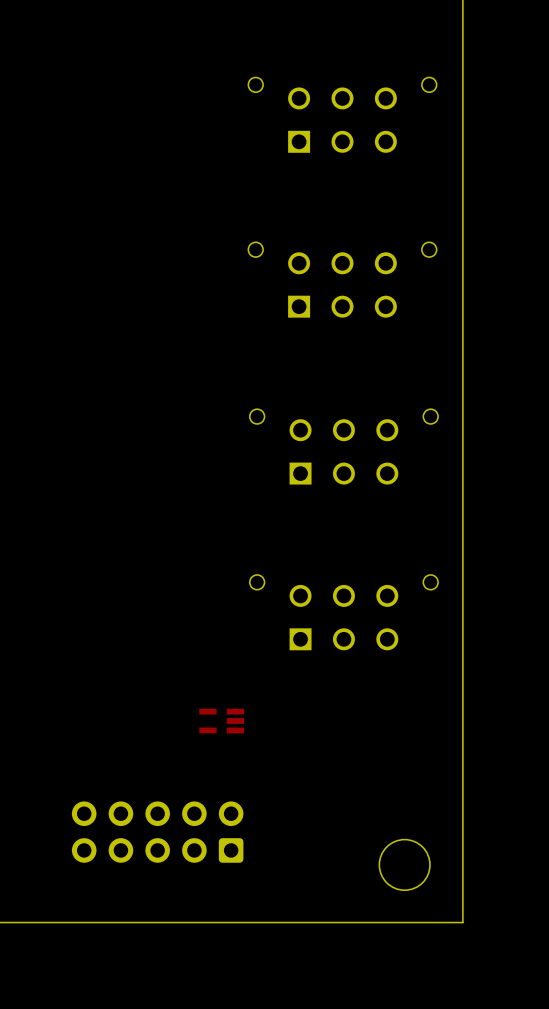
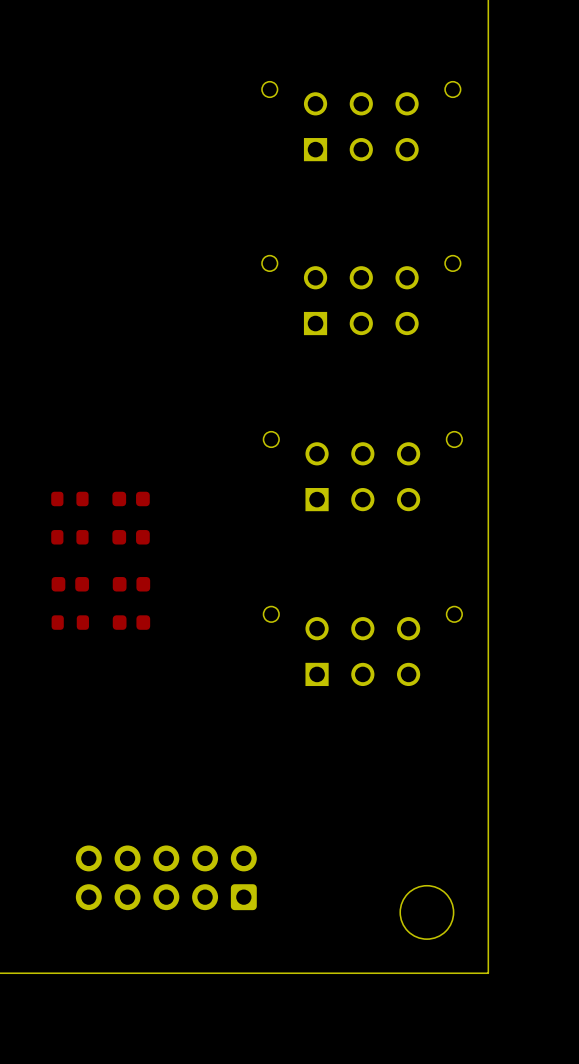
part: none -> (69, 498)
part: none -> (131, 498)
part: none -> (69, 537)
part: none -> (131, 537)
part: none -> (70, 584)
part: none -> (131, 584)
part: none -> (70, 622)
part: none -> (131, 622)
part: (221, 721) -> none

